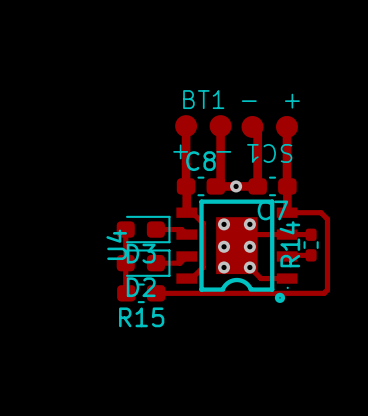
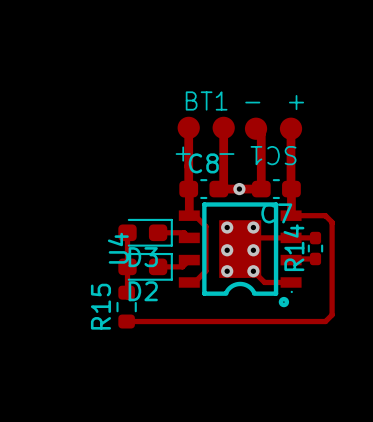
R15 footprint: [117, 283, 166, 304] -> [116, 285, 137, 329]
track: (327, 289) (324, 293) (156, 293) -> (332, 293) (332, 314) (325, 321) (126, 321)
R15 name position: R15 (141, 317) -> R15 (100, 306)

